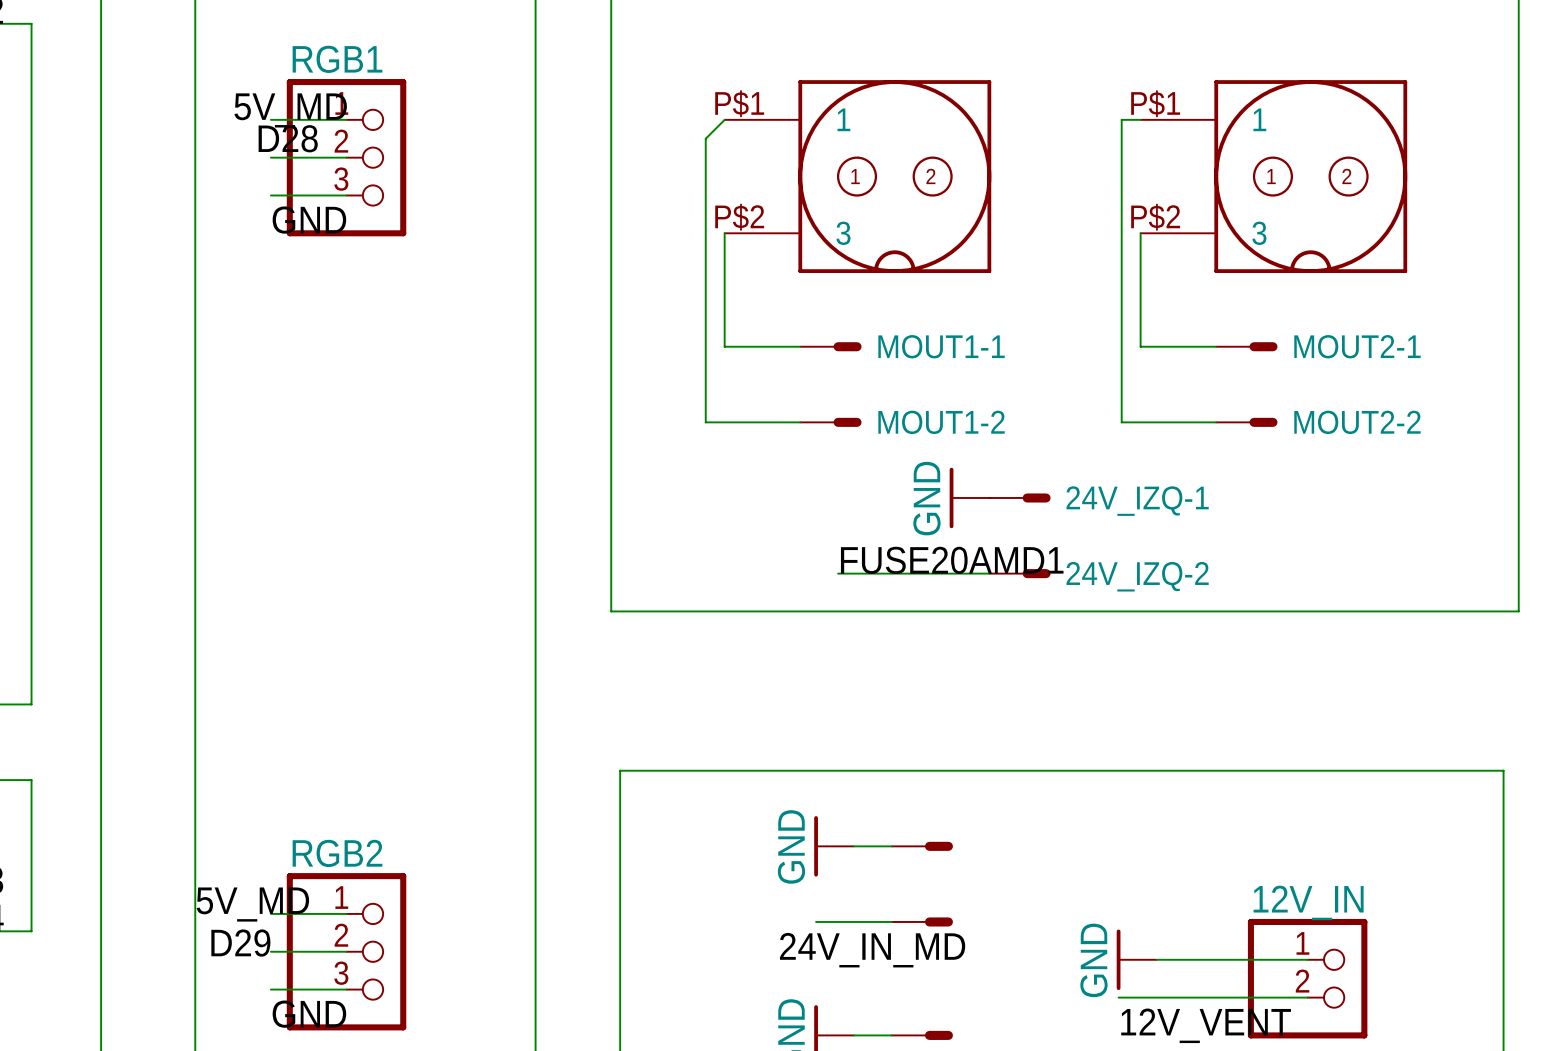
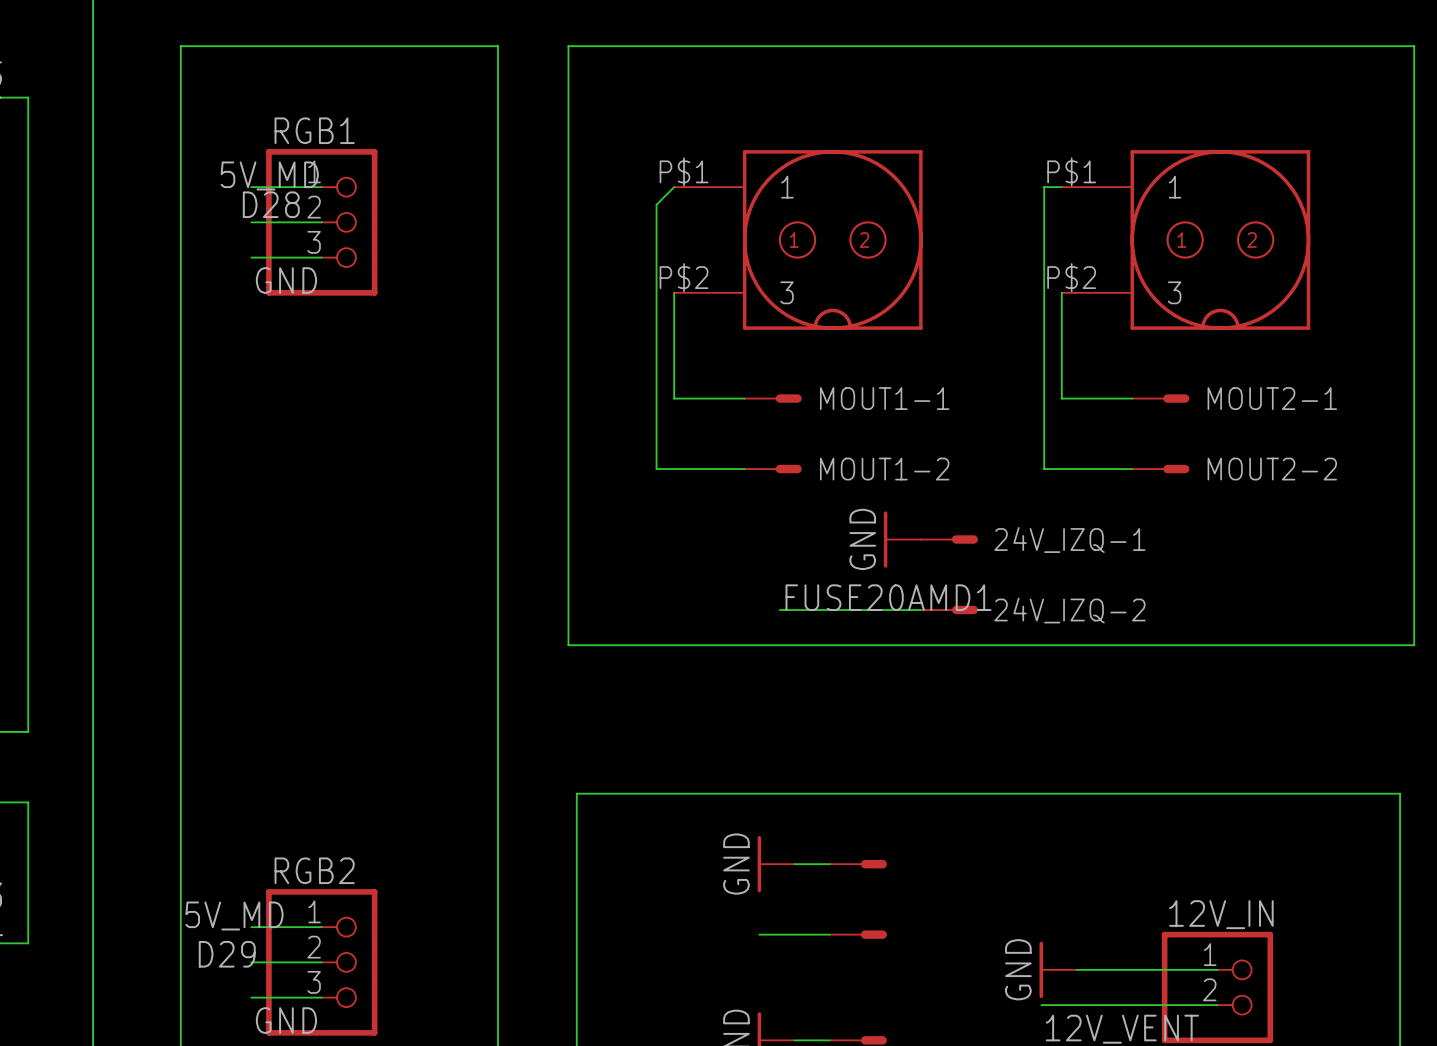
label: 24V_IN_MD (872, 950) -> none

